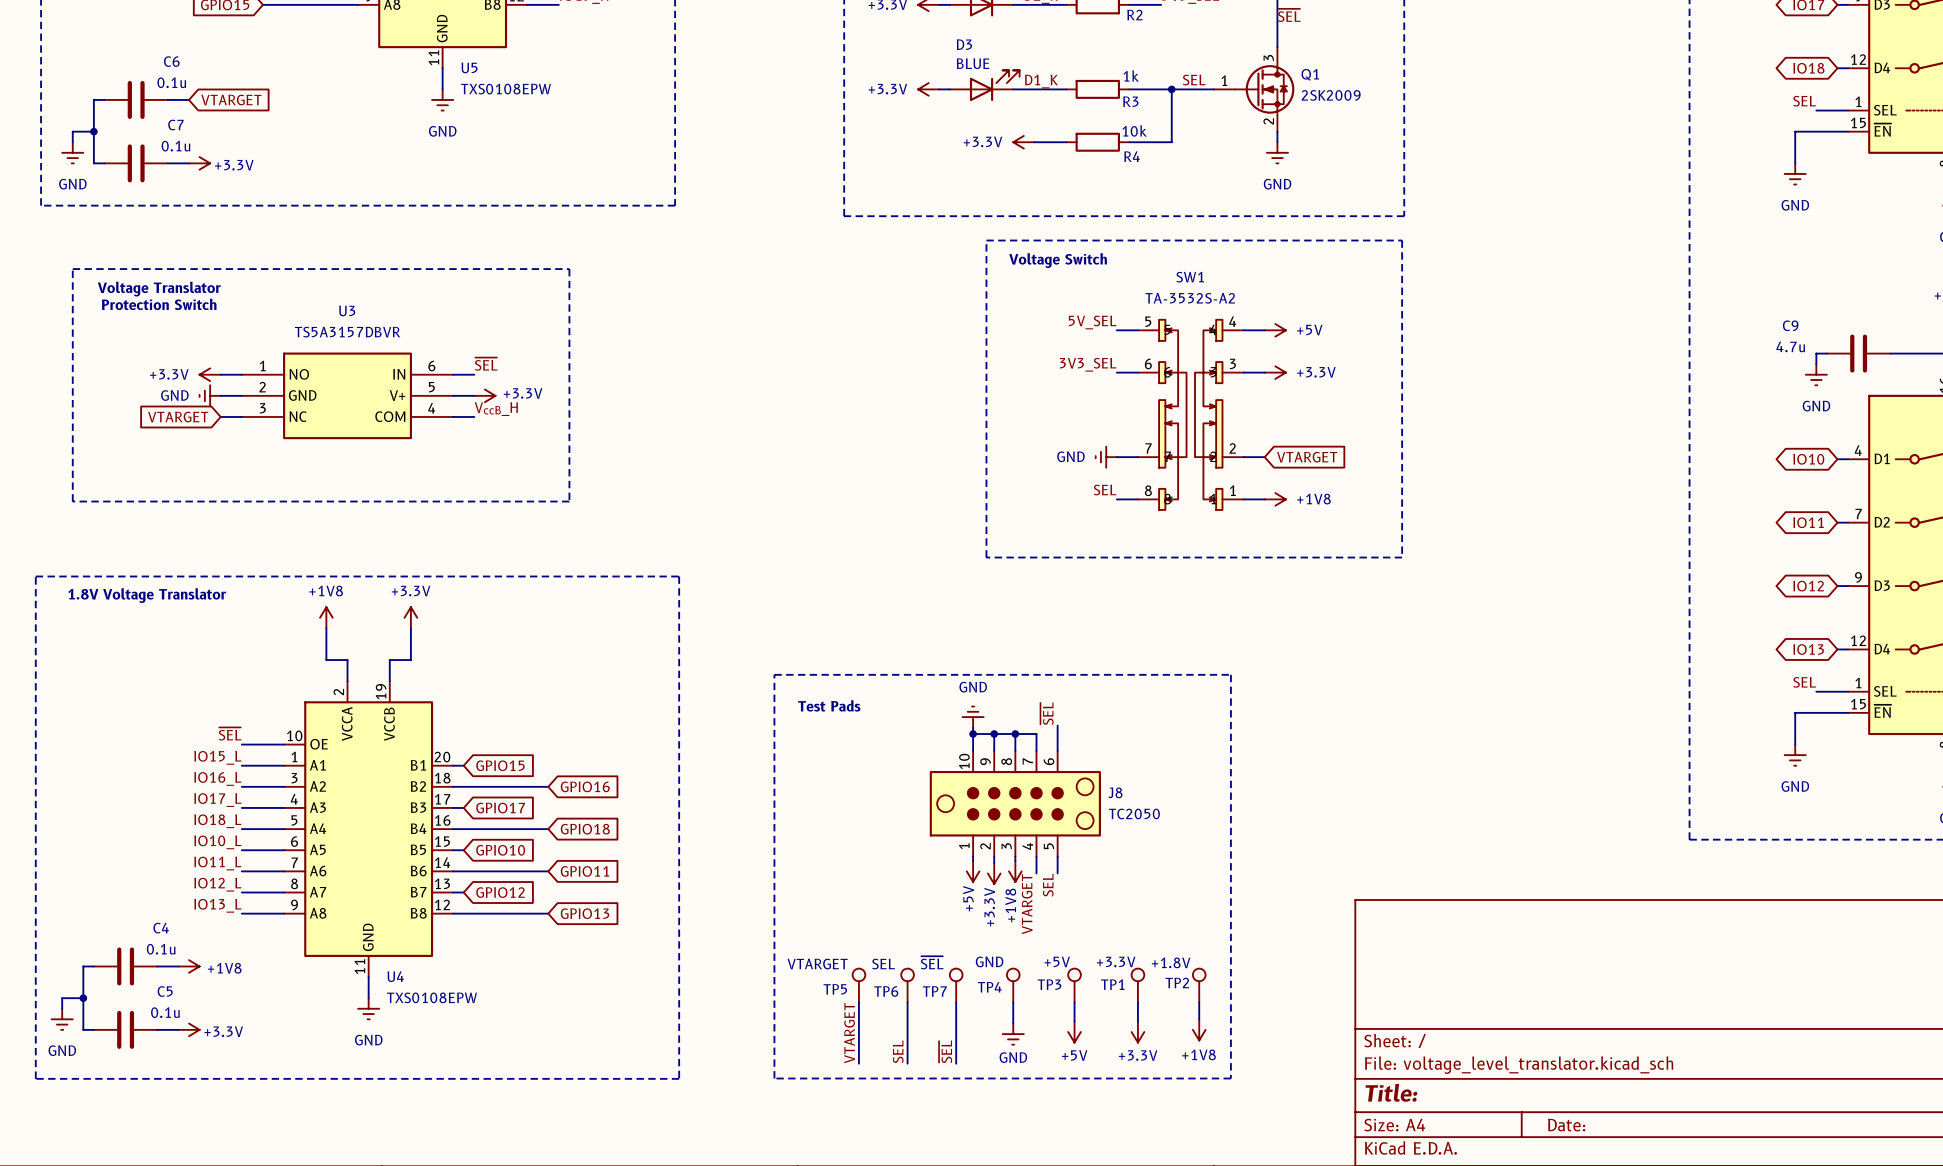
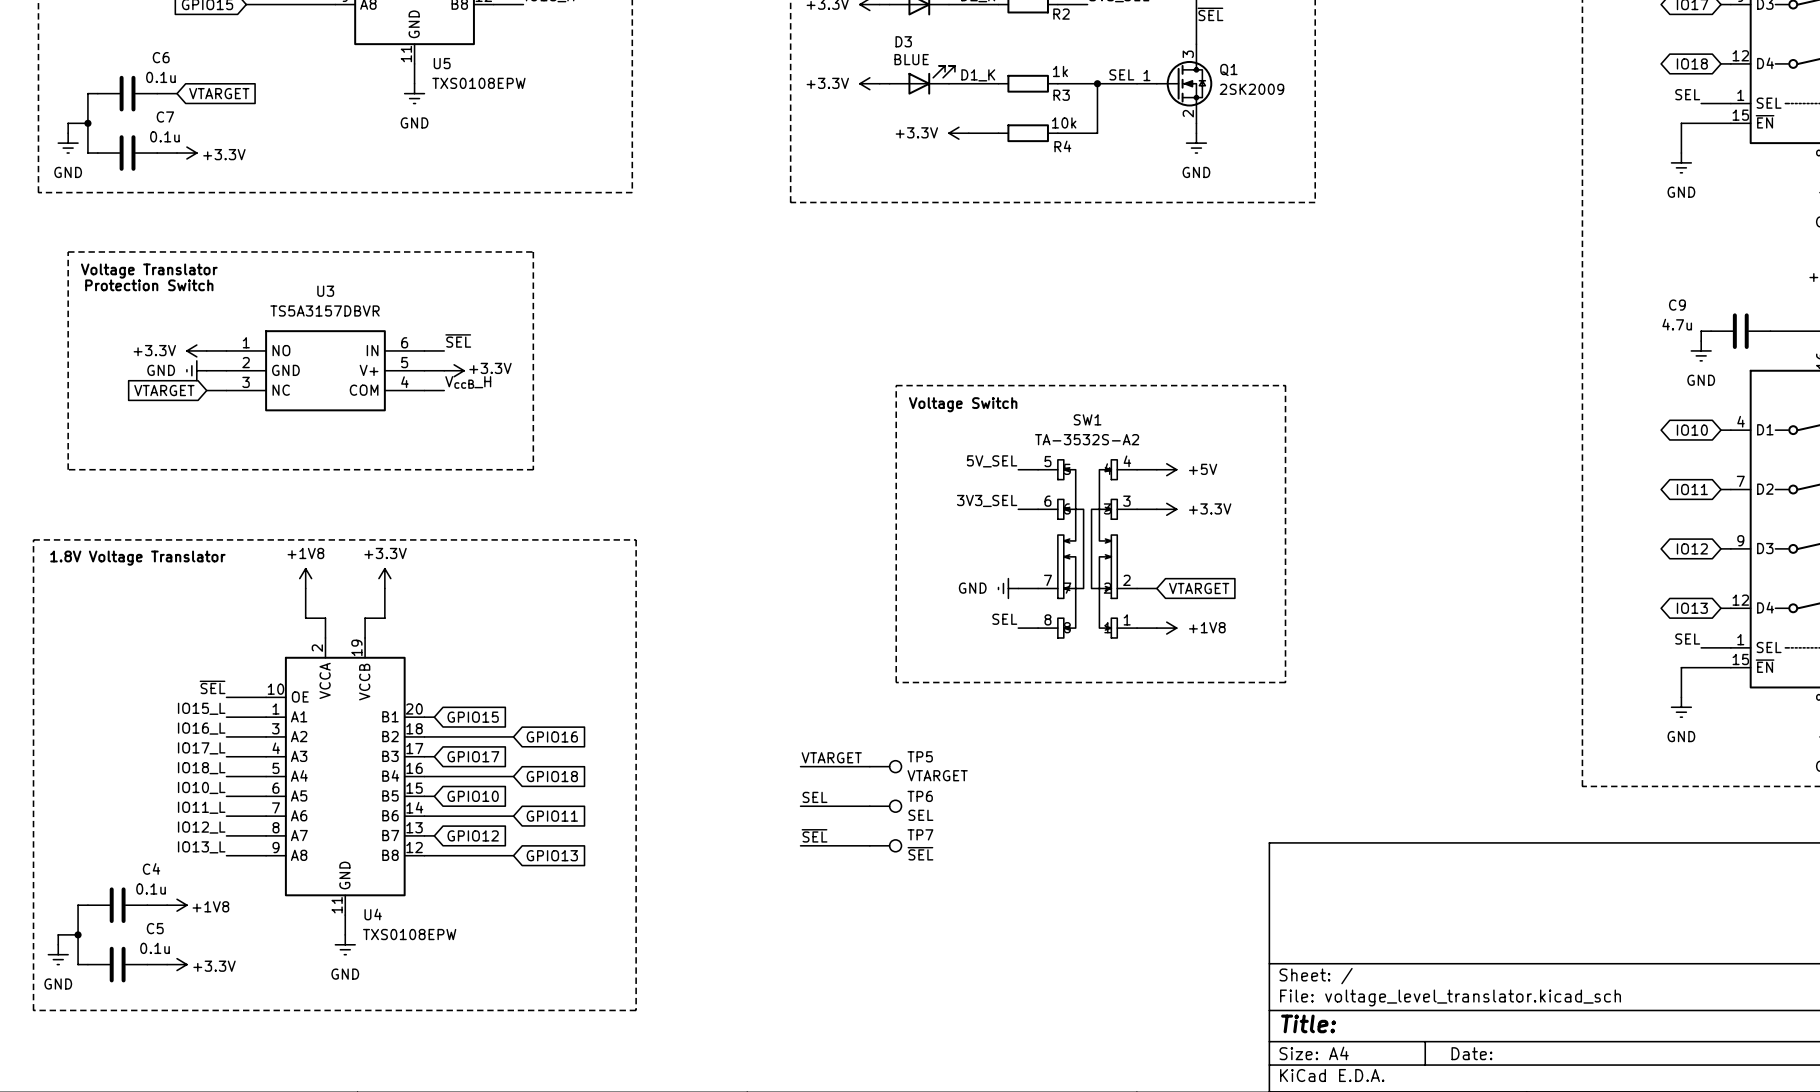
line: (986, 240) (1402, 240) (1402, 557) (986, 557) (986, 240) -> (896, 385) (1285, 385) (1285, 682) (896, 682) (896, 385)
text position: Voltage Switch (1058, 260) -> Voltage Switch (963, 404)
label position: 5V_SEL (1092, 322) -> 5V_SEL (992, 461)
wire: (1116, 330) (1137, 330) -> (1018, 469) (1038, 469)
wire: (1243, 330) (1264, 330) -> (1137, 469) (1156, 469)
power symbol position: +5V (1275, 330) -> +5V (1166, 469)
label position: 3V3_SEL (1088, 364) -> 3V3_SEL (987, 500)
wire: (1116, 372) (1137, 372) -> (1018, 509) (1038, 509)
wire: (1243, 372) (1264, 372) -> (1137, 509) (1156, 509)
power symbol position: +3.3V (1275, 372) -> +3.3V (1166, 509)
SW1 position: (1190, 414) -> (1087, 548)
power symbol: GND (1106, 457) -> none
wire: (1116, 457) (1137, 457) -> (1018, 588) (1038, 588)
wire: (1243, 457) (1264, 457) -> (1137, 588) (1156, 588)
global label position: VTARGET (1307, 457) -> VTARGET (1199, 588)
label: SEL (1105, 490) -> none
wire: (1116, 499) (1137, 499) -> (1018, 628) (1038, 628)
wire: (1243, 499) (1264, 499) -> (1137, 628) (1156, 628)
power symbol: +1V8 (1275, 499) -> none
power symbol: none -> GND (1008, 588)
power symbol: none -> +1V8 (1166, 628)
line: (774, 674) (1230, 674) (1230, 1078) (774, 1078) (774, 674) -> none
text: Test Pads (829, 705) -> none
label: ~{SEL} (1047, 713) -> SEL (1004, 619)
power symbol: GND (973, 717) -> none
wire: (1057, 725) (1057, 750) -> none
wire: (973, 727) (973, 750) -> none
wire: (973, 734) (1036, 734) (1036, 750) -> none
junction: (973, 734) -> none
wire: (994, 734) (994, 750) -> none
junction: (994, 734) -> none
wire: (1015, 734) (1015, 750) -> none
junction: (1015, 734) -> none
J8: TC2050 (1015, 803) -> none
label: none -> VTARGET (831, 757)
wire: none -> (800, 766) (869, 766)
label: none -> SEL (814, 797)
wire: (973, 856) (973, 860) -> none
wire: (994, 856) (994, 862) -> none
wire: (1015, 856) (1015, 860) -> none
wire: (1036, 856) (1036, 873) -> none
wire: (1057, 856) (1057, 873) -> none
wire: none -> (800, 806) (869, 806)
power symbol: +5V (973, 871) -> none
power symbol: +1V8 (1015, 871) -> none
power symbol: +3.3V (994, 873) -> none
label: SEL (1048, 885) -> none
label: none -> ~{SEL} (814, 835)
wire: none -> (800, 845) (869, 845)
label: VTARGET (1027, 904) -> none
TP7 value position: ~{SEL} (932, 962) -> ~{SEL} (920, 853)
TP5 value position: VTARGET (817, 964) -> VTARGET (937, 775)
TP6 value position: SEL (883, 964) -> SEL (920, 815)
TP5 rotation: 0° (858, 974) -> 90° clockwise (895, 766)
TP6 rotation: 0° (907, 974) -> 90° clockwise (895, 806)
TP7 rotation: 0° (956, 974) -> 90° clockwise (895, 845)
TP5 position: (858, 985) -> (885, 766)
TP6 position: (907, 985) -> (885, 806)
TP7 position: (956, 985) -> (885, 845)
TP4: GND (1013, 985) -> none
TP3: +5V (1074, 985) -> none
TP1: +3.3V (1137, 985) -> none
TP2: +1.8V (1199, 985) -> none
TP5 name position: TP5 (835, 989) -> TP5 (920, 756)
TP6 name position: TP6 (886, 991) -> TP6 (920, 796)
TP7 name position: TP7 (934, 991) -> TP7 (920, 834)
wire: (858, 1002) (858, 1063) -> none
wire: (907, 1002) (907, 1063) -> none
wire: (956, 1002) (956, 1063) -> none
wire: (1013, 1002) (1013, 1023) -> none
wire: (1074, 1002) (1074, 1021) -> none
wire: (1137, 1002) (1137, 1021) -> none
wire: (1199, 1002) (1199, 1019) -> none
power symbol: +1V8 (1199, 1029) -> none
power symbol: +5V (1074, 1032) -> none
power symbol: +3.3V (1137, 1032) -> none
label: VTARGET (849, 1033) -> none
power symbol: GND (1013, 1034) -> none
label: SEL (898, 1051) -> none
label: ~{SEL} (945, 1051) -> none

